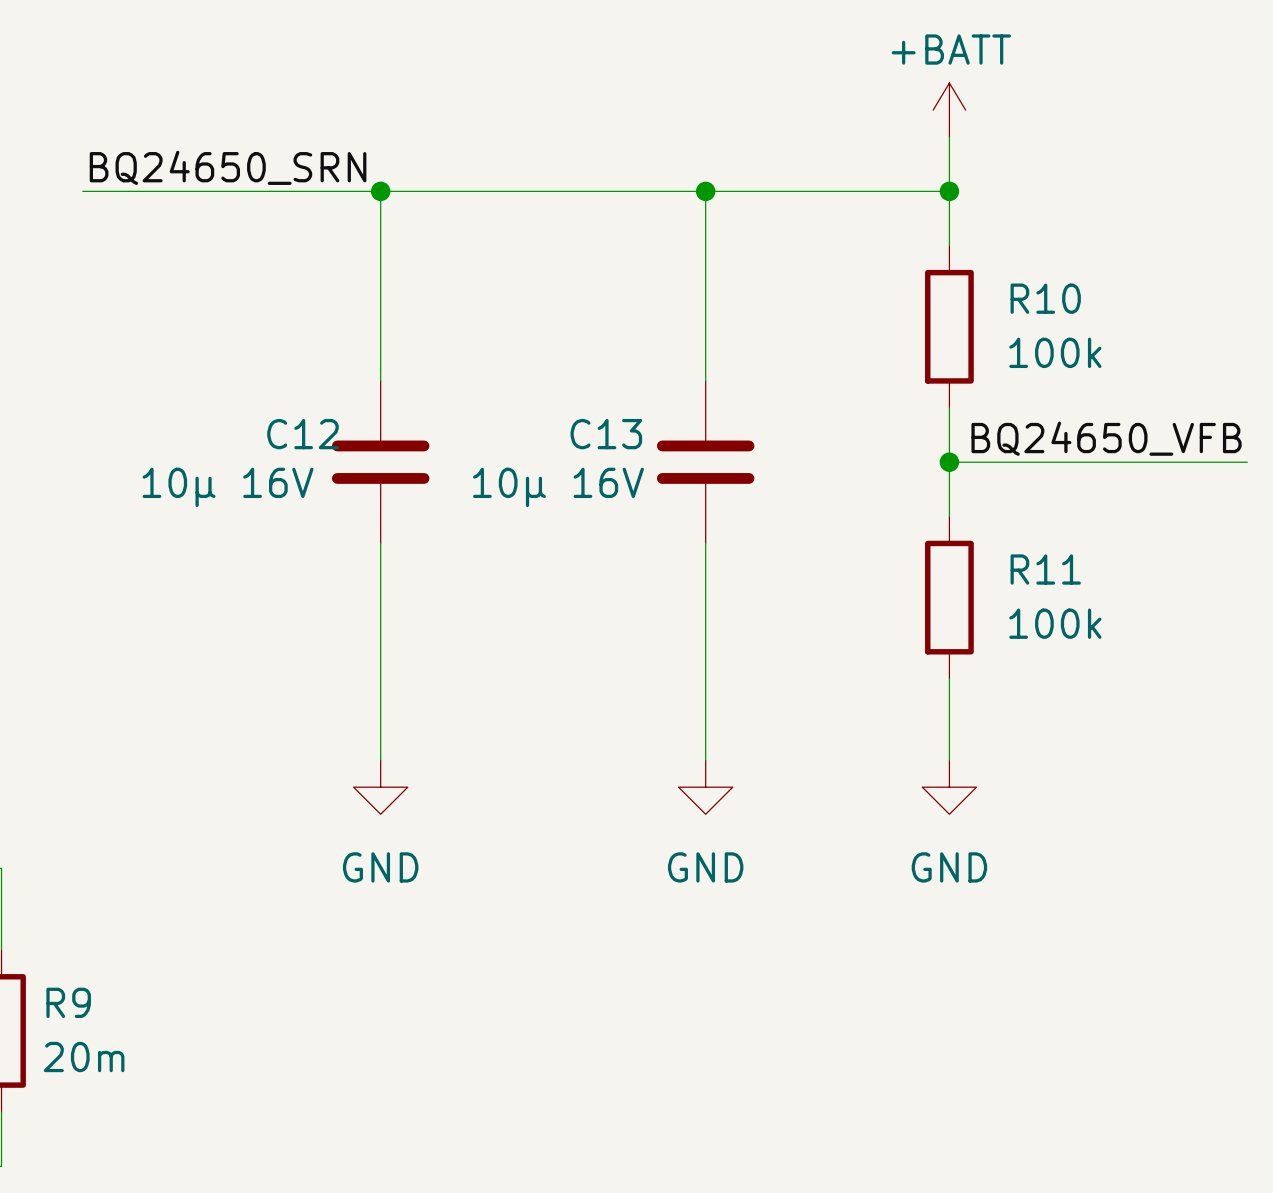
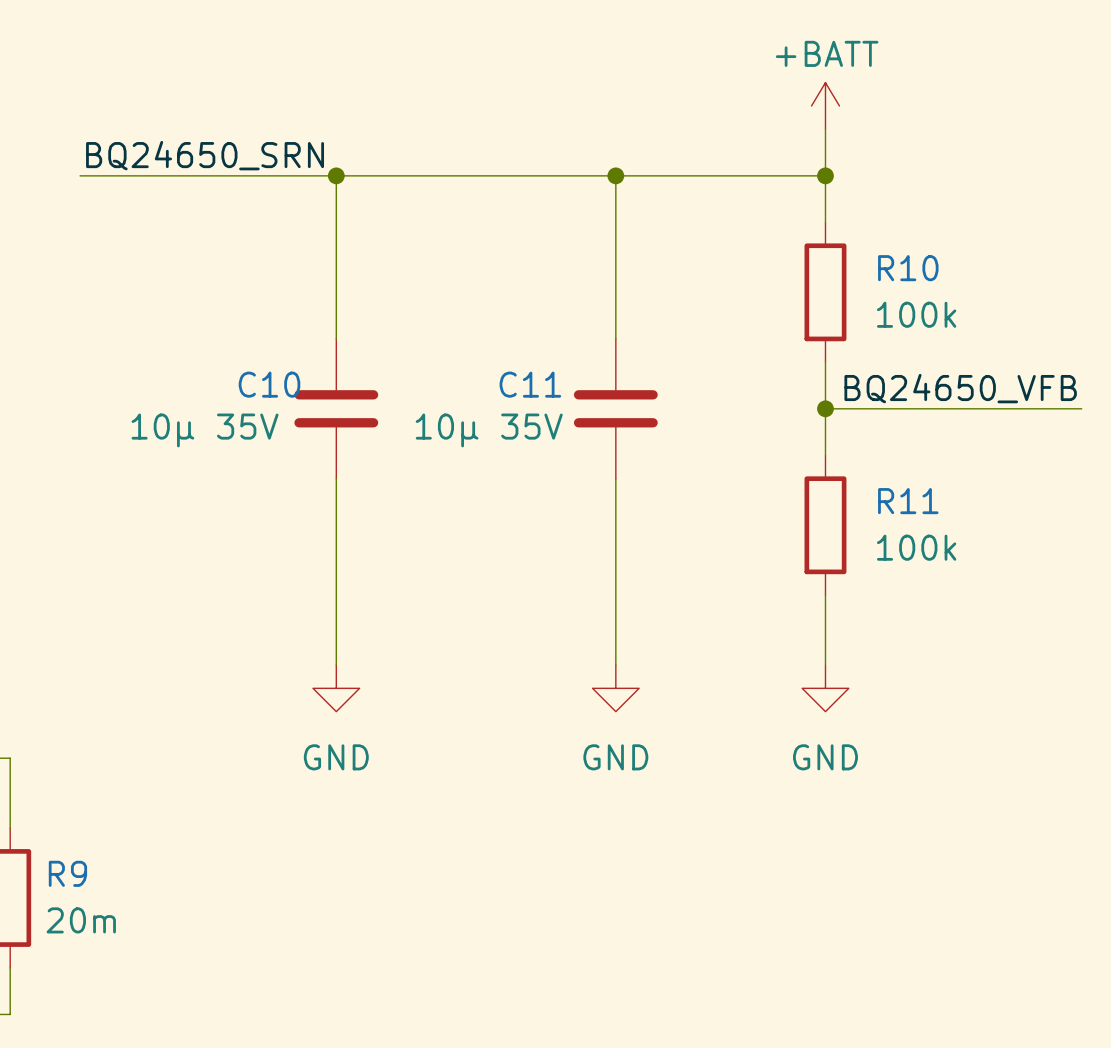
C12 name: C12 (302, 434) -> C10 (269, 384)
C13 name: C13 (606, 434) -> C11 (530, 384)
C12 value: 10µ 16V (228, 487) -> 10µ 35V (205, 430)
C13 value: 10µ 16V (558, 487) -> 10µ 35V (489, 430)

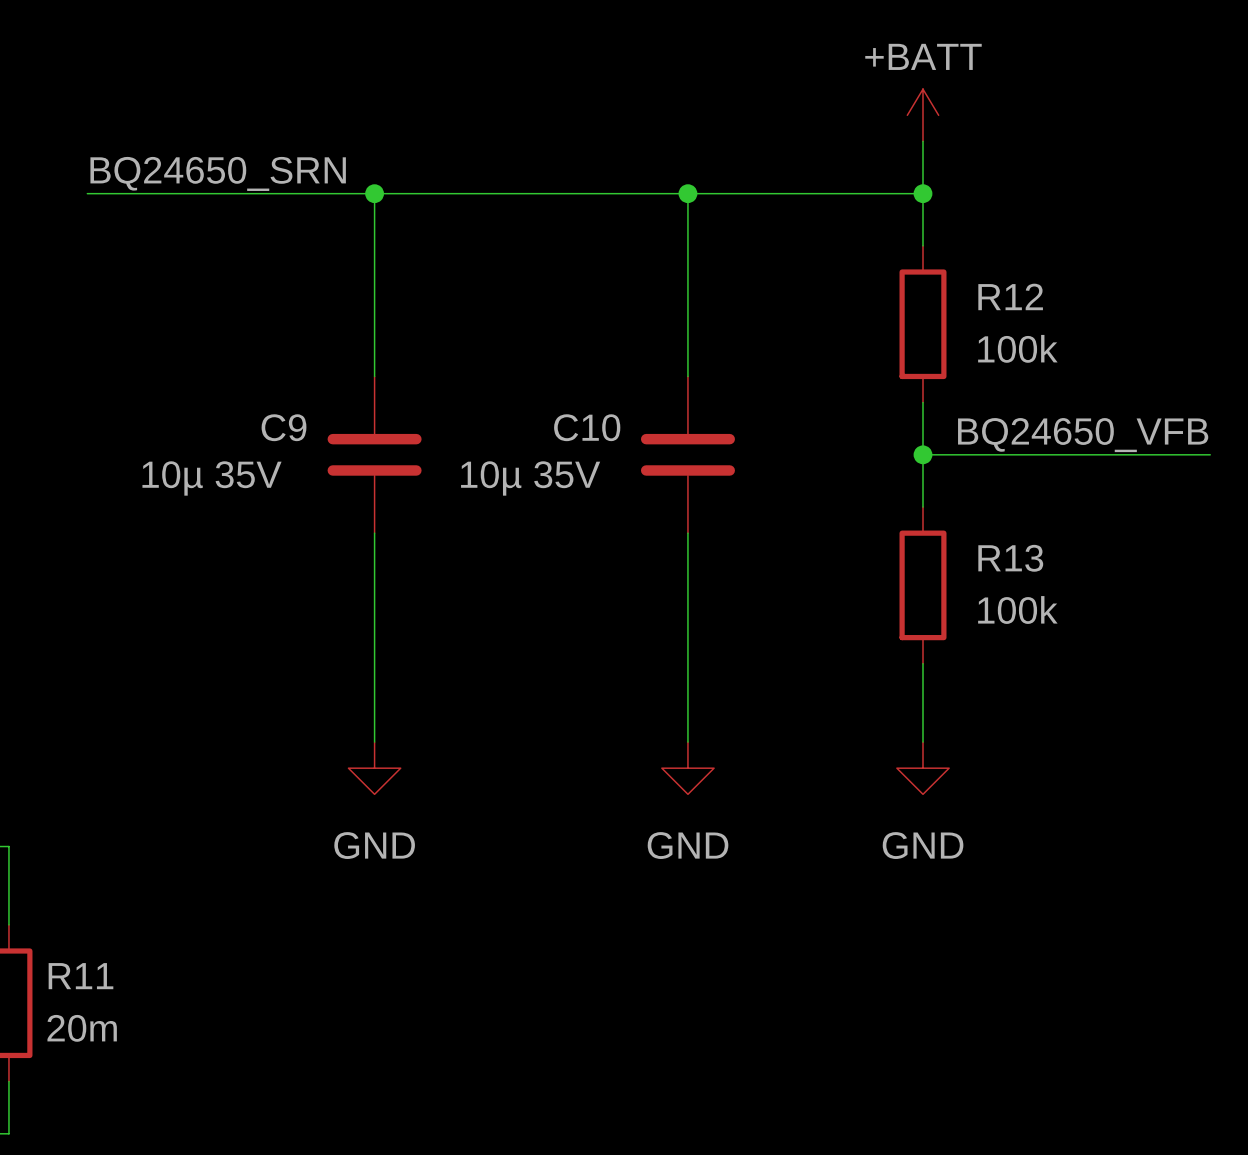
R10 name: R10 (908, 268) -> R12 (1010, 296)
C10 name: C10 (269, 384) -> C9 (284, 427)
C11 name: C11 (530, 384) -> C10 (587, 427)
R11 name: R11 (908, 501) -> R13 (1010, 558)
R9 name: R9 (67, 873) -> R11 (80, 976)

